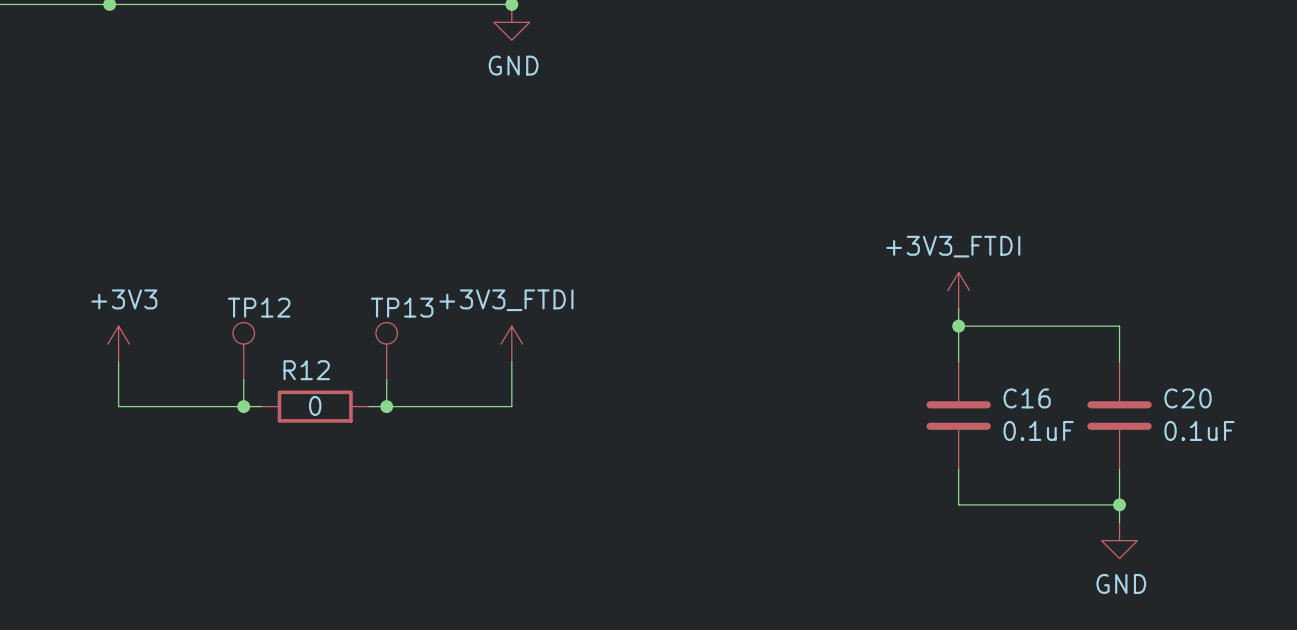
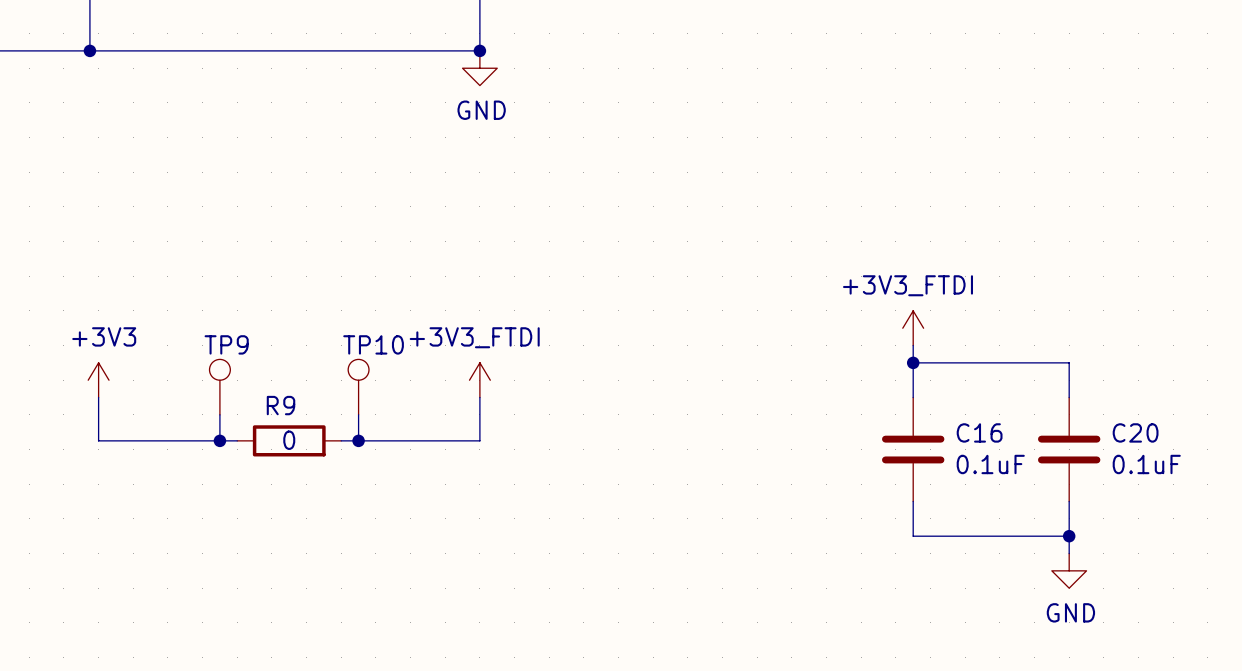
TP12 name: TP12 (259, 307) -> TP9 (226, 344)
TP13 name: TP13 (402, 307) -> TP10 (373, 344)
R12 name: R12 (306, 370) -> R9 (281, 405)

